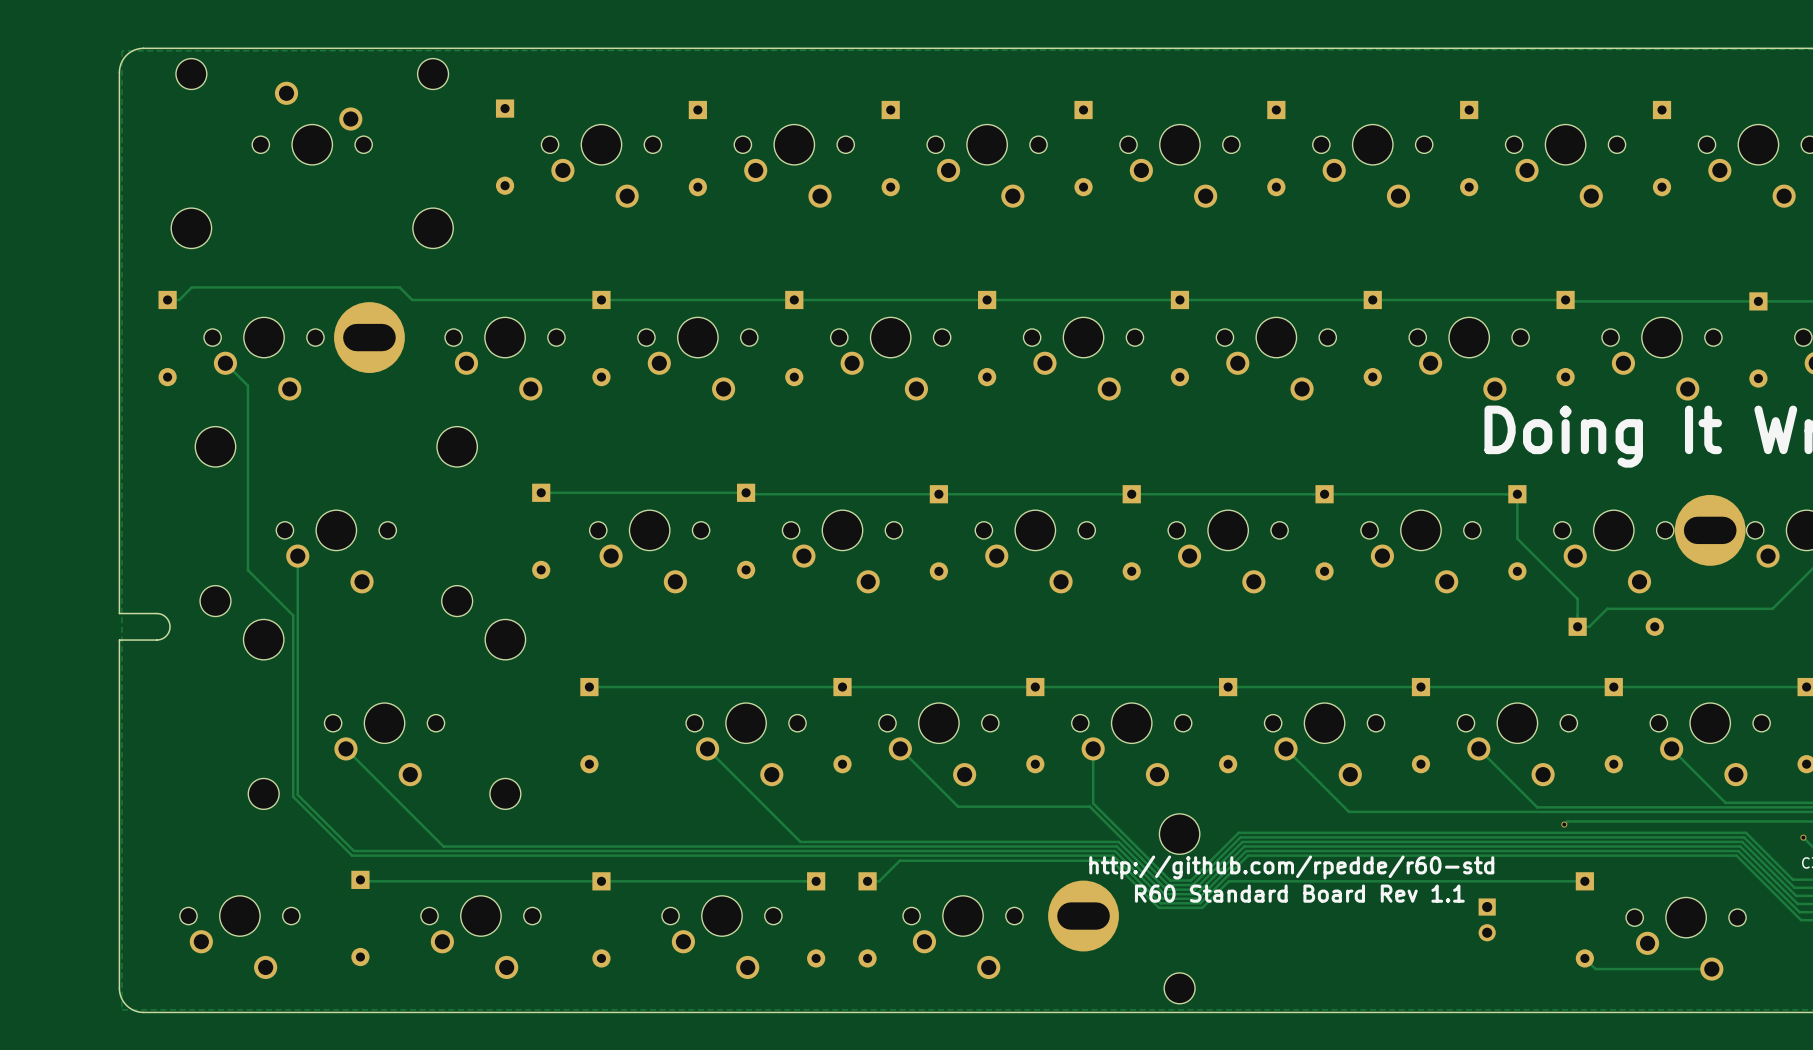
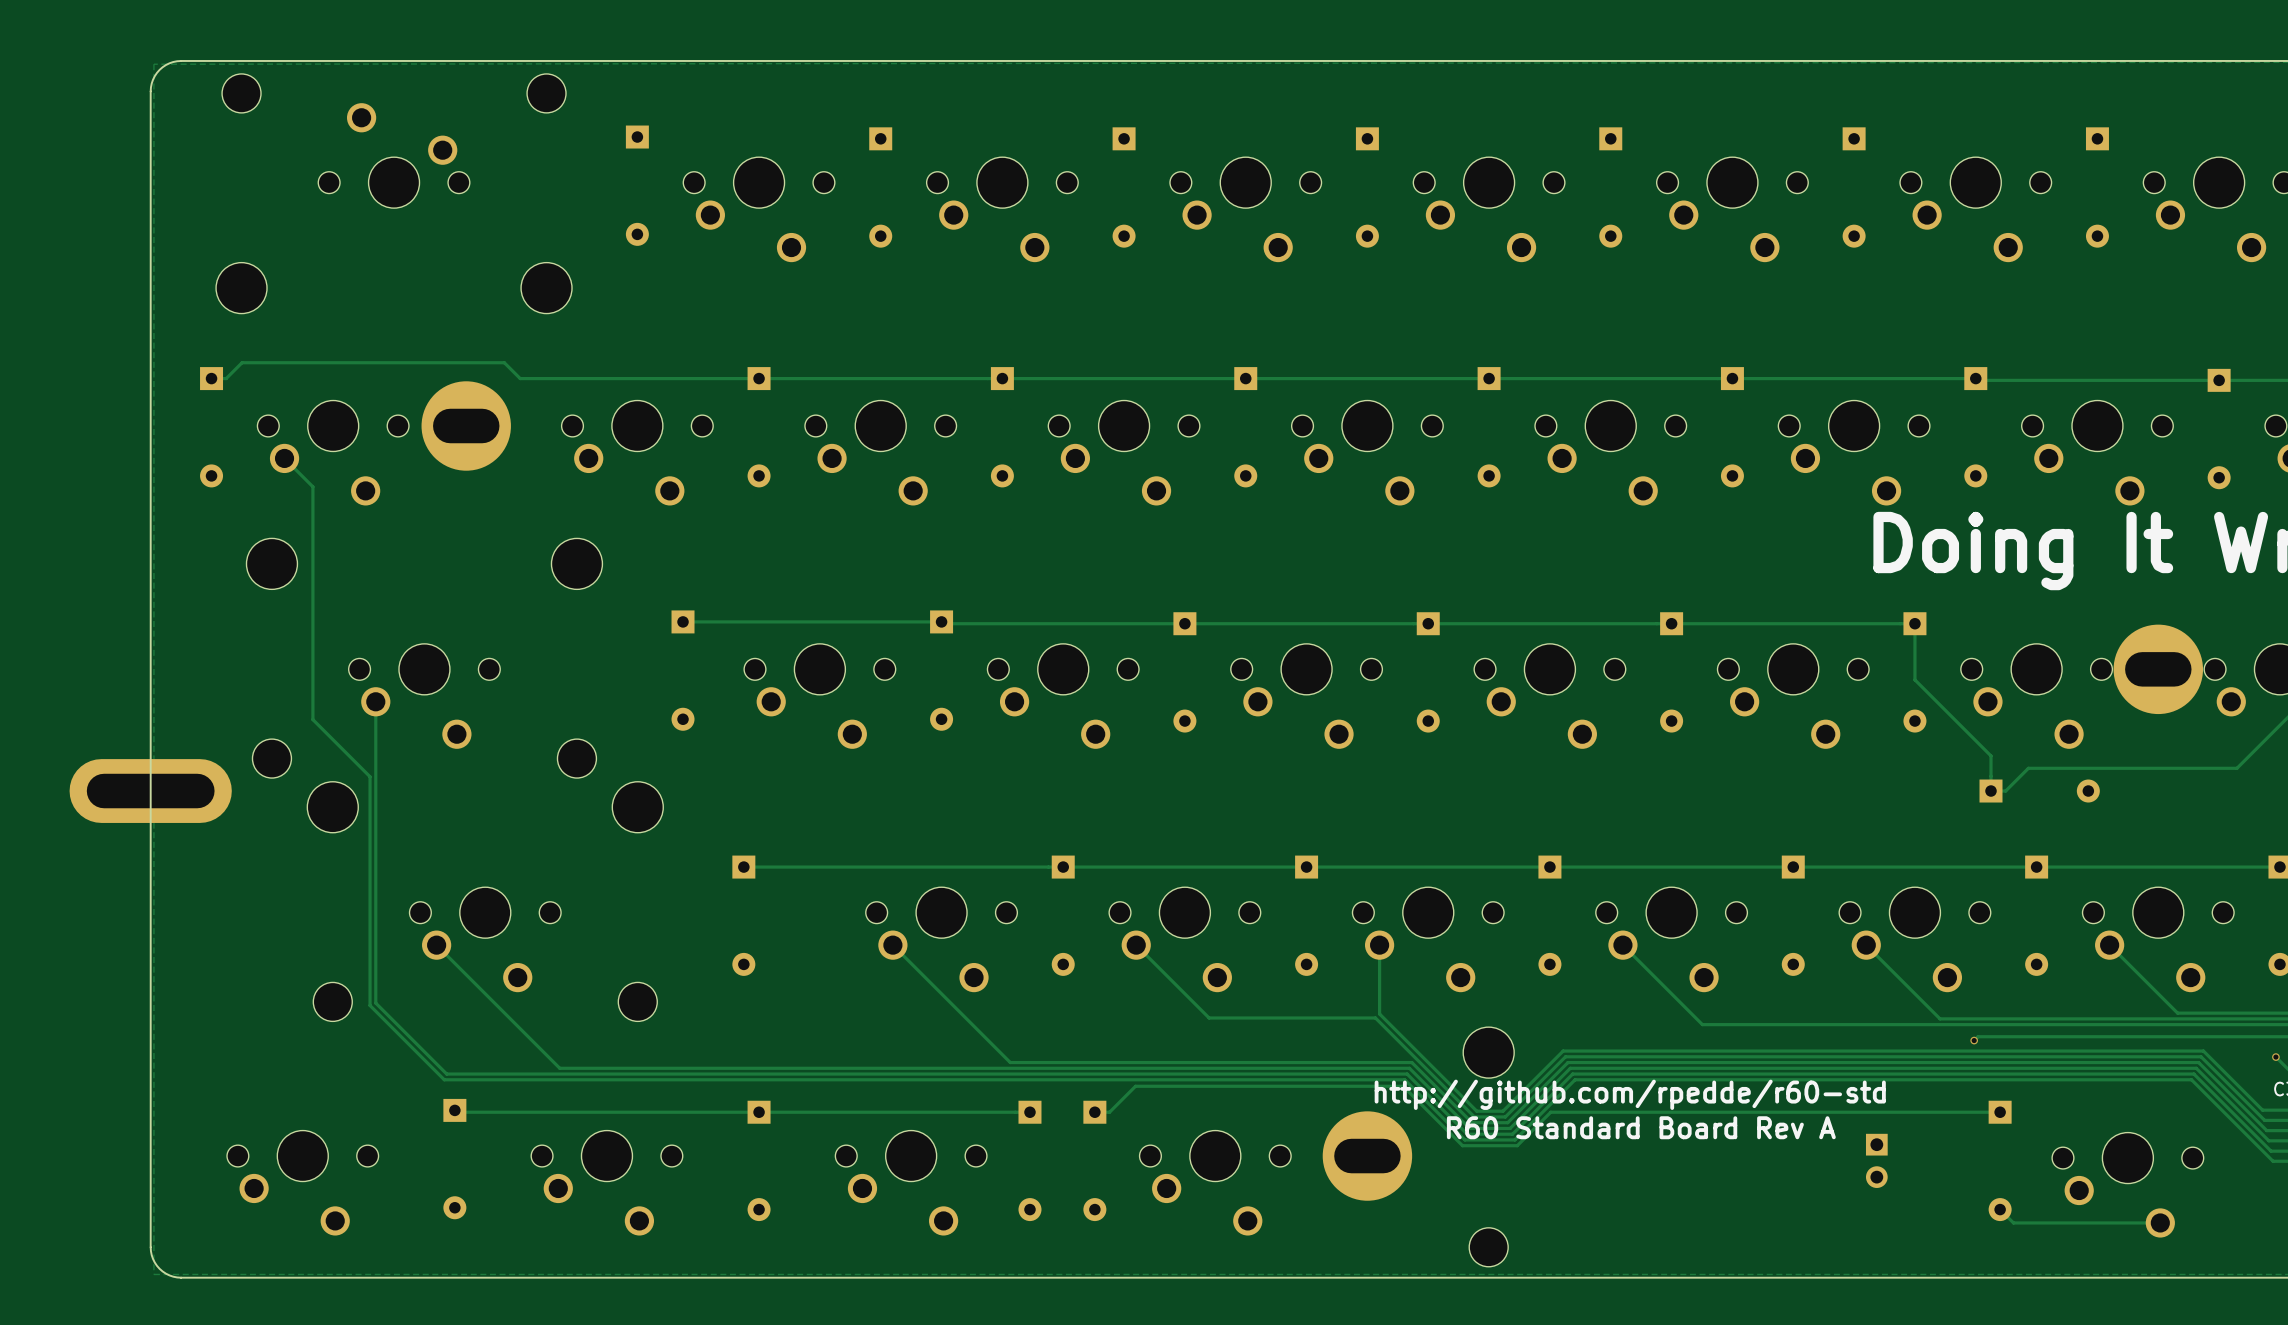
board edge: (119, 613) (160, 613) (167, 618) (170, 626) (167, 634) (160, 639) (119, 640) -> (150, 774) (150, 807)
part: none -> (150, 791)
text: R60 Standard Board Rev 1.1 (1299, 893) -> R60 Standard Board Rev A (1641, 1127)

